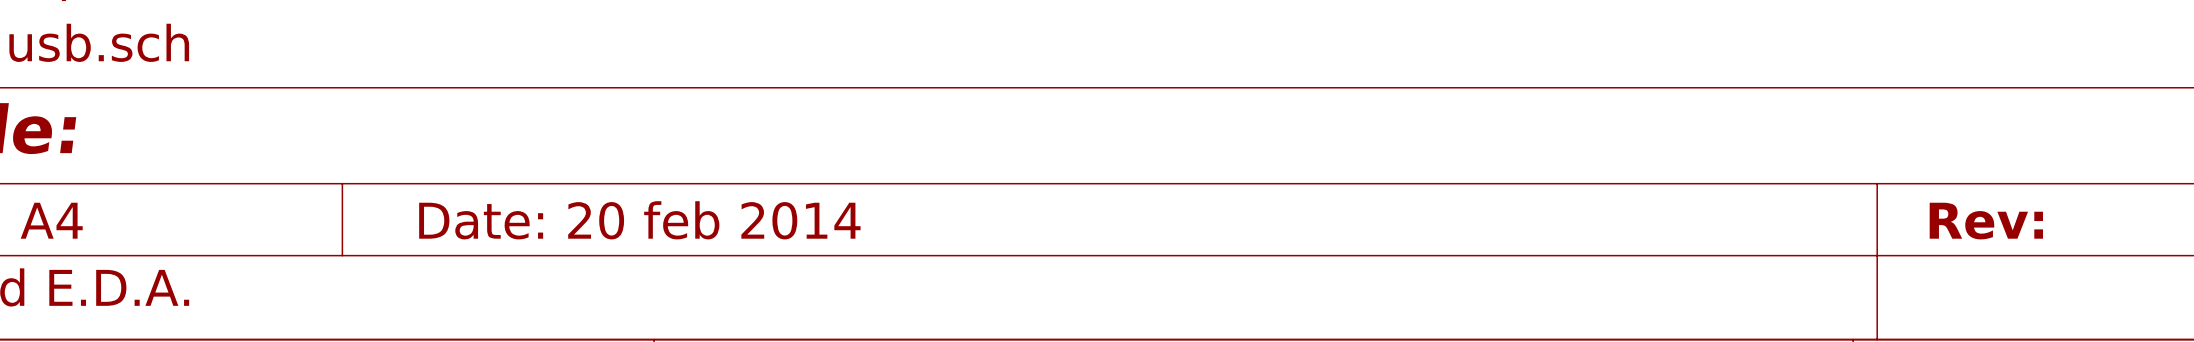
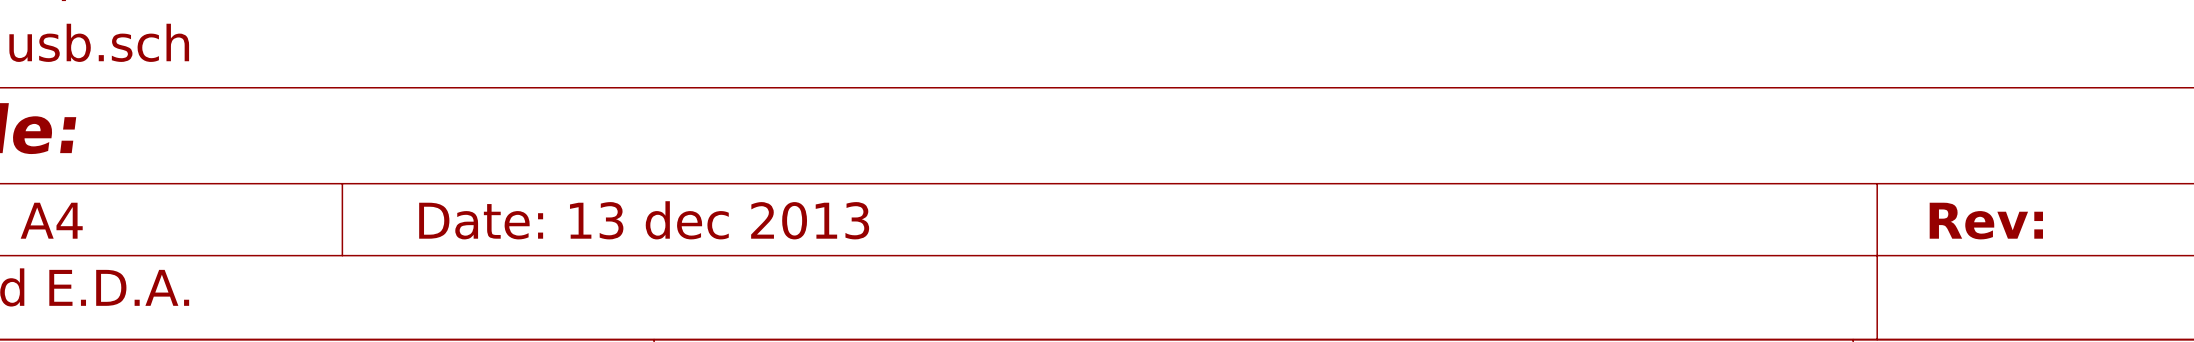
title block: Date: 20 feb 2014 (639, 220) -> Date: 13 dec 2013 (644, 220)

